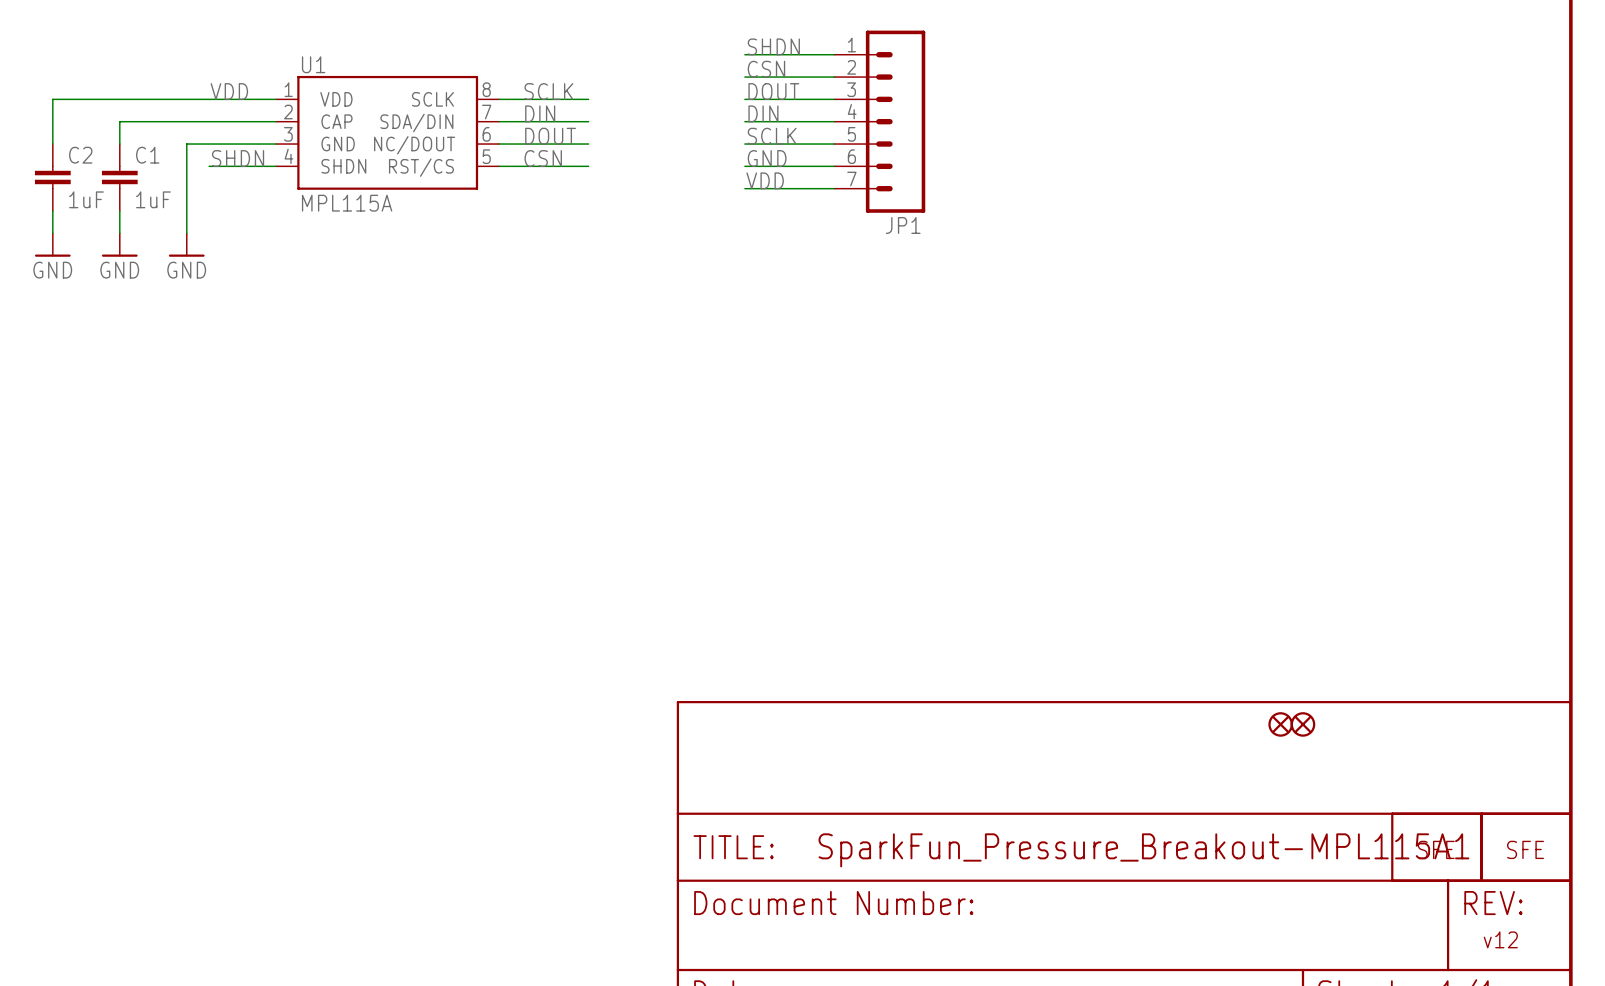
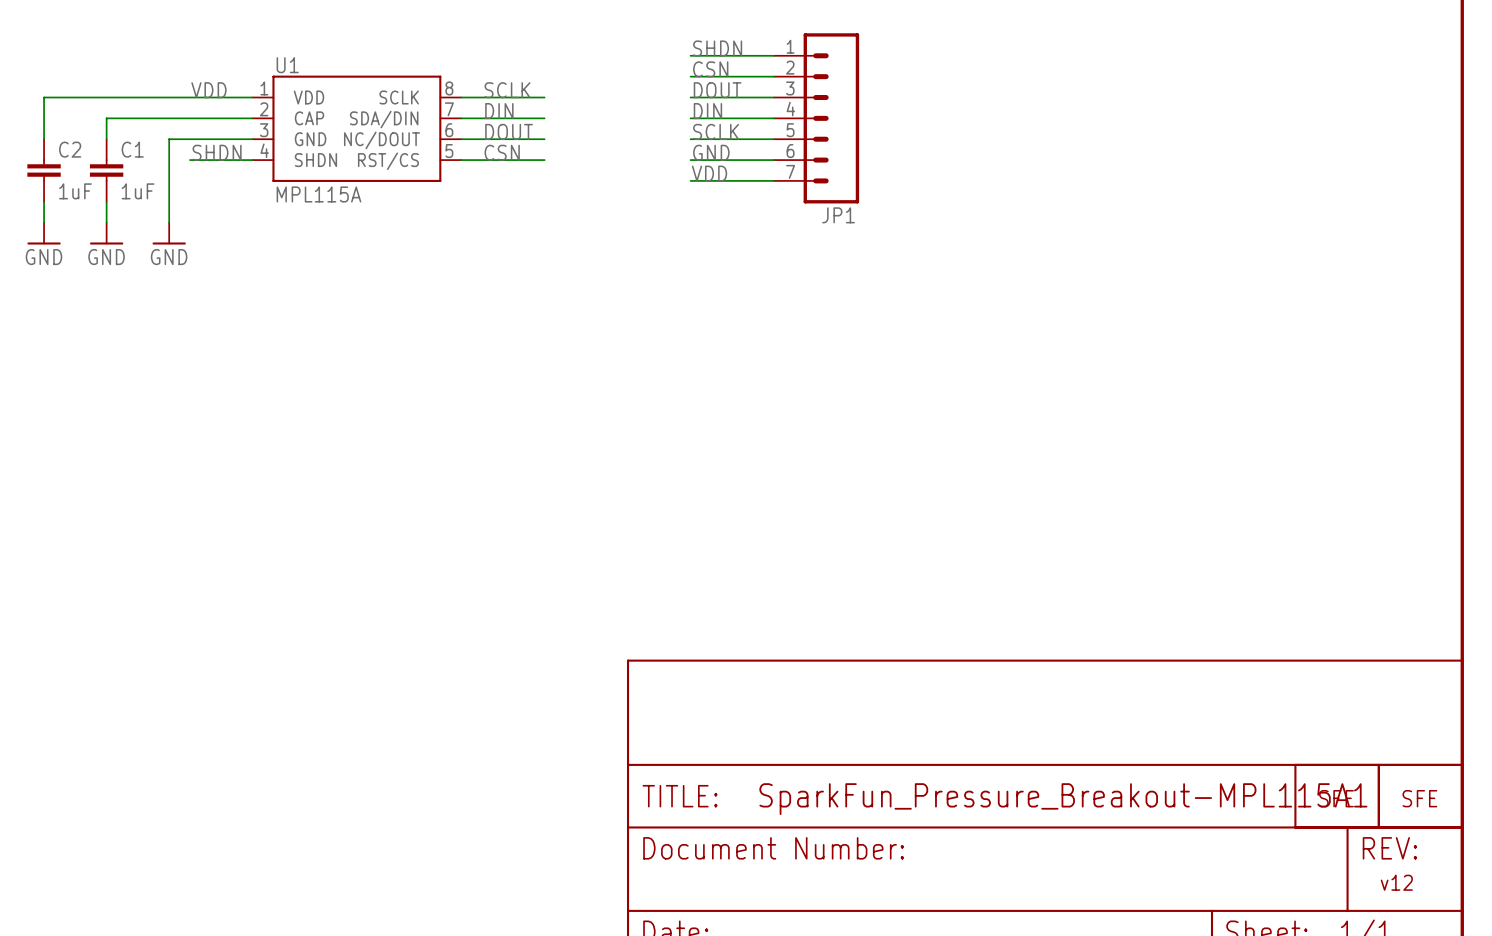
part: (1280, 724) -> none
part: (1302, 724) -> none

